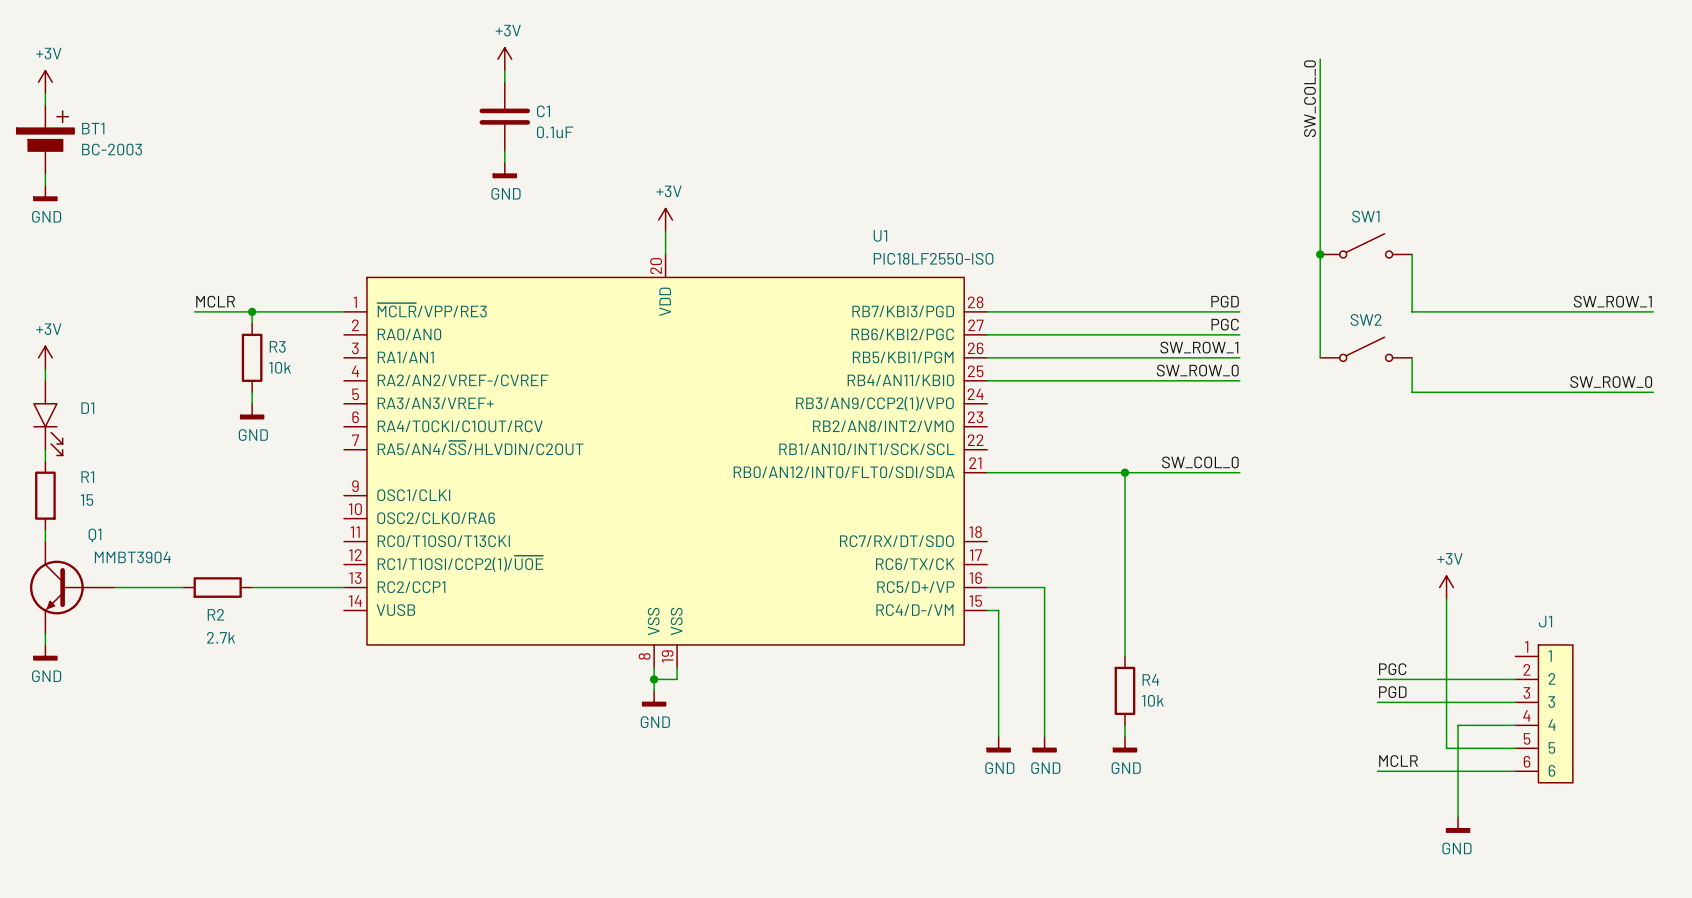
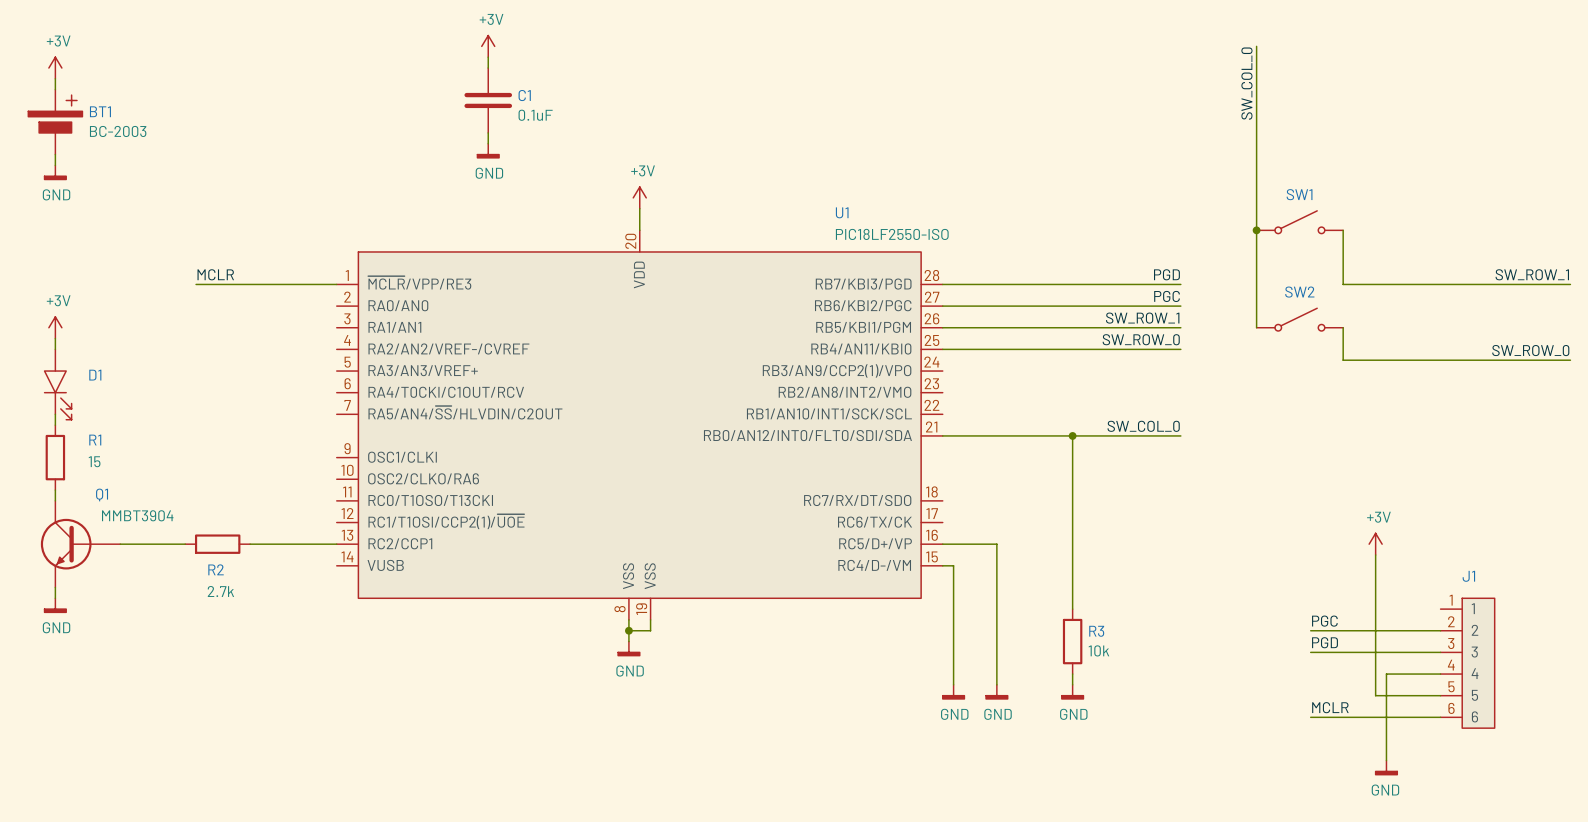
wire: (252, 311) (252, 323) -> none
junction: (252, 311) -> none
R3: (252, 357) -> none
wire: (252, 392) (252, 403) -> none
power symbol: GND (252, 411) -> none
R4 name: R4 (1150, 679) -> R3 (1096, 631)

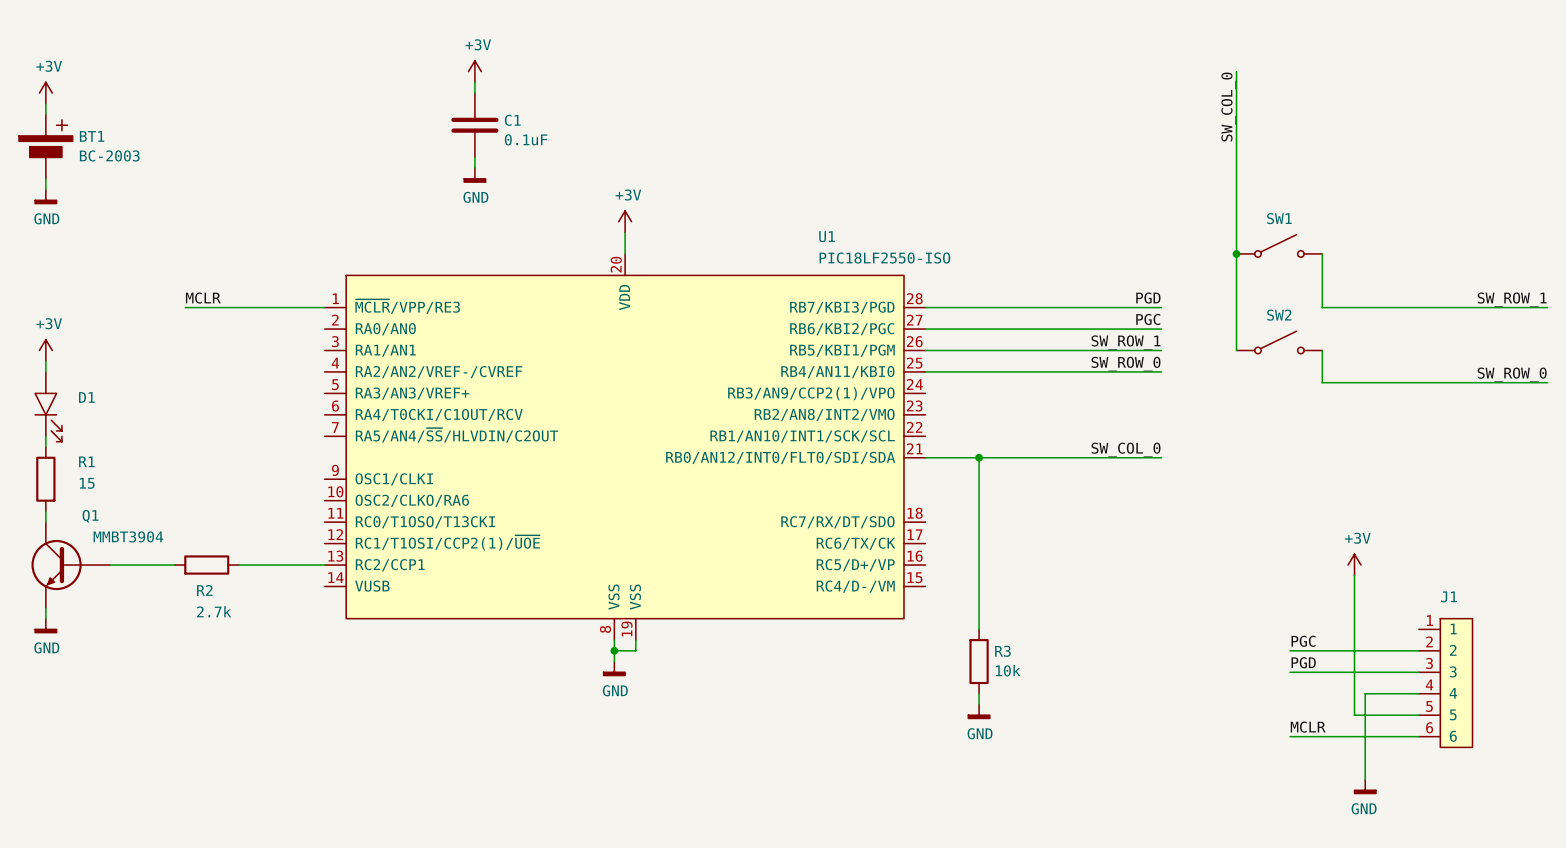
junction: none -> (979, 457)
wire: (1072, 435) (1072, 609) -> none
junction: (1072, 435) -> none
wire: (942, 544) (996, 544) -> (979, 457) (979, 565)
wire: (942, 565) (953, 565) (953, 684) -> none
wire: (996, 609) (996, 674) -> none
R3 position: (1072, 641) -> (979, 661)
wire: (1072, 674) (1072, 684) -> none
power symbol: GND (953, 691) -> none
power symbol: GND (1072, 691) -> none

